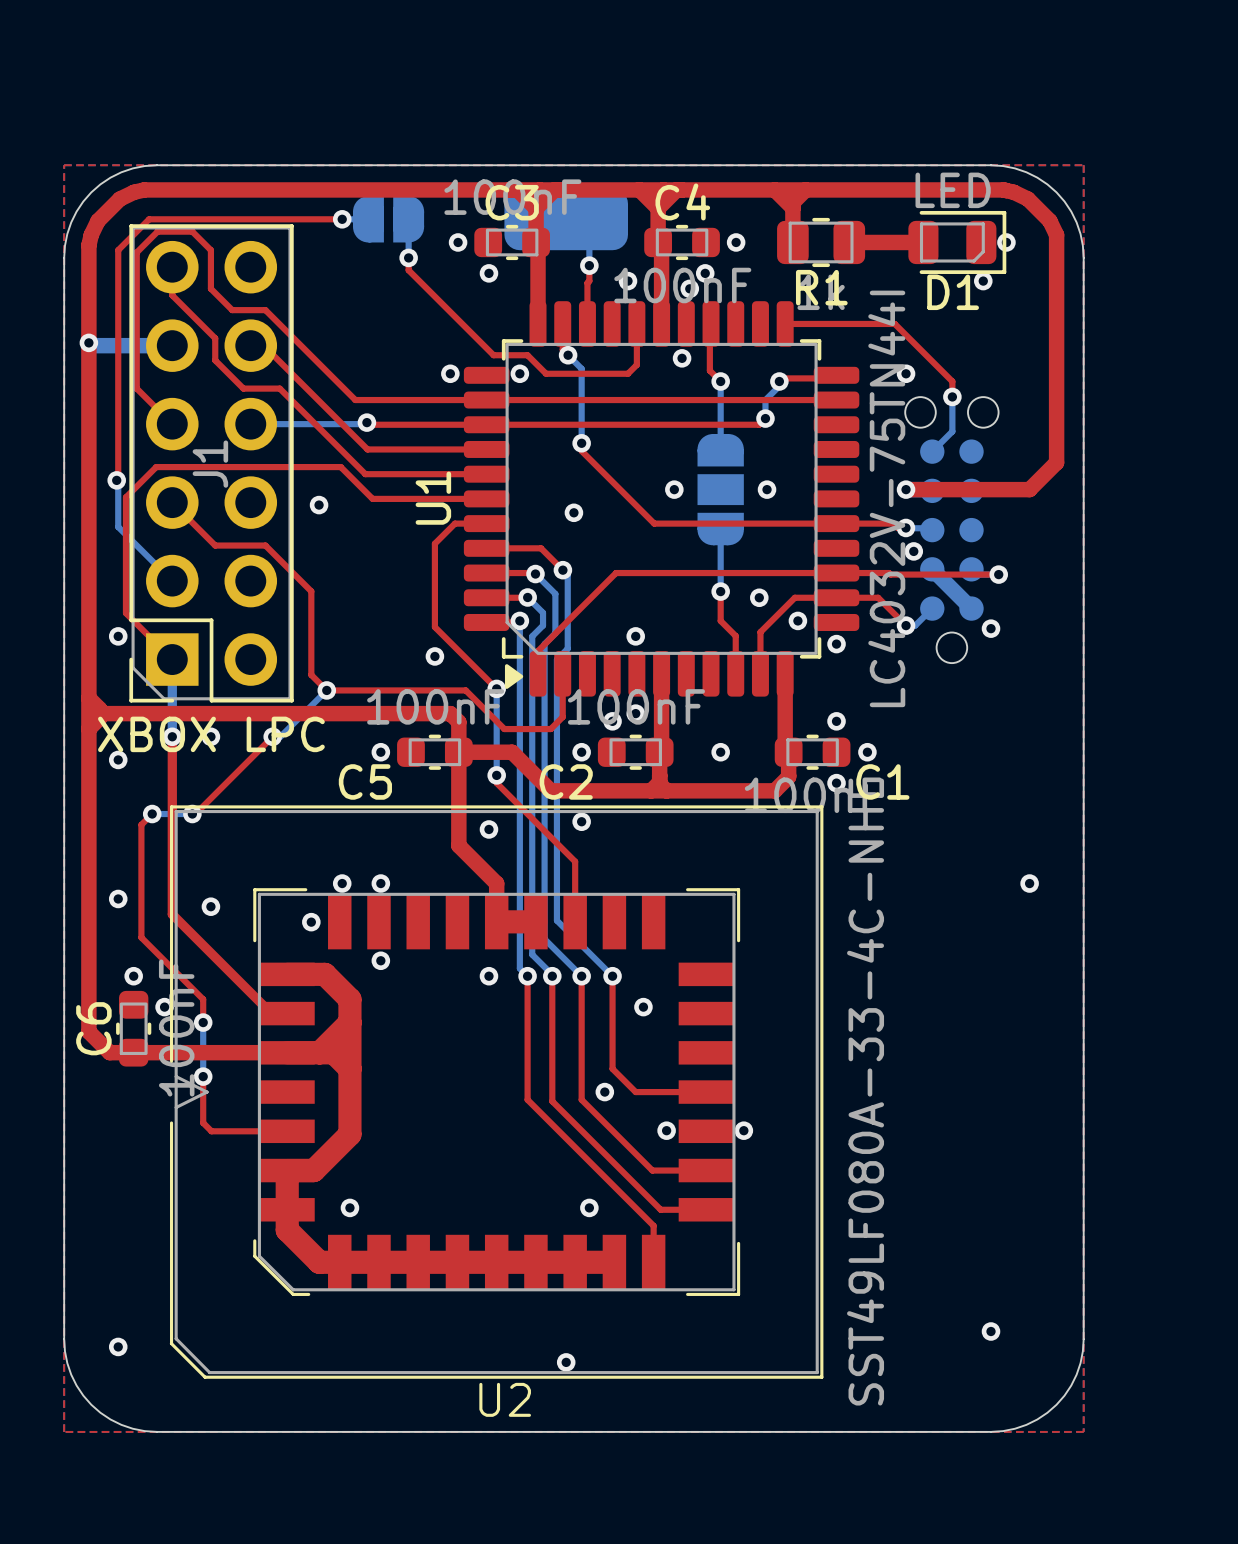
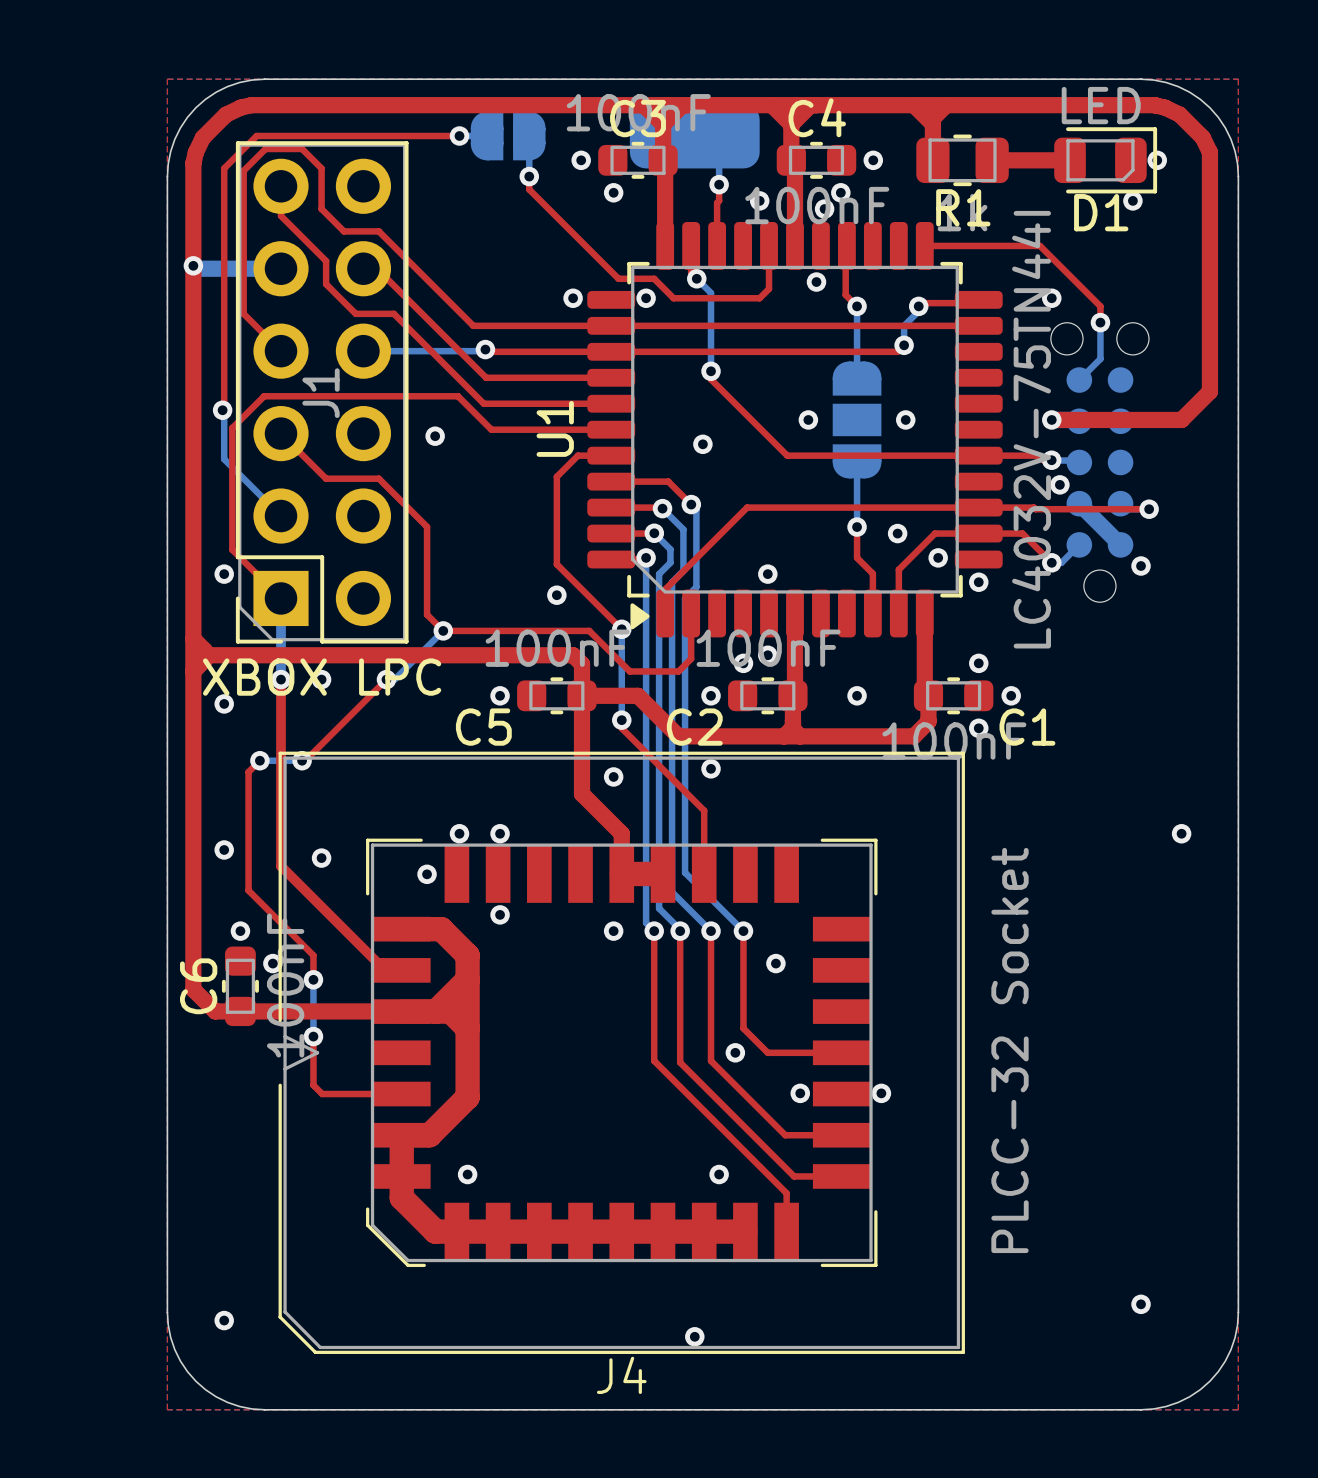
U2 value: SST49LF080A-33-4C-NHE (865, 1092) -> PLCC-32 Socket (1010, 1050)
U2 name: U2 (505, 1399) -> J4 (621, 1375)

